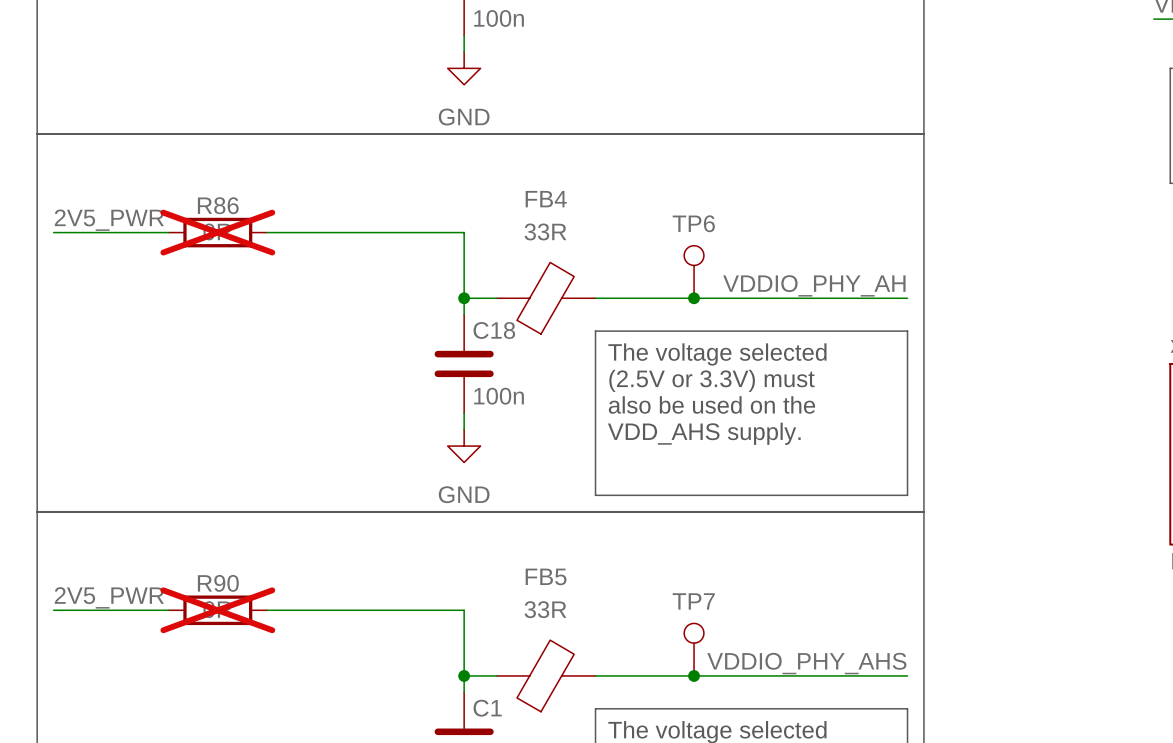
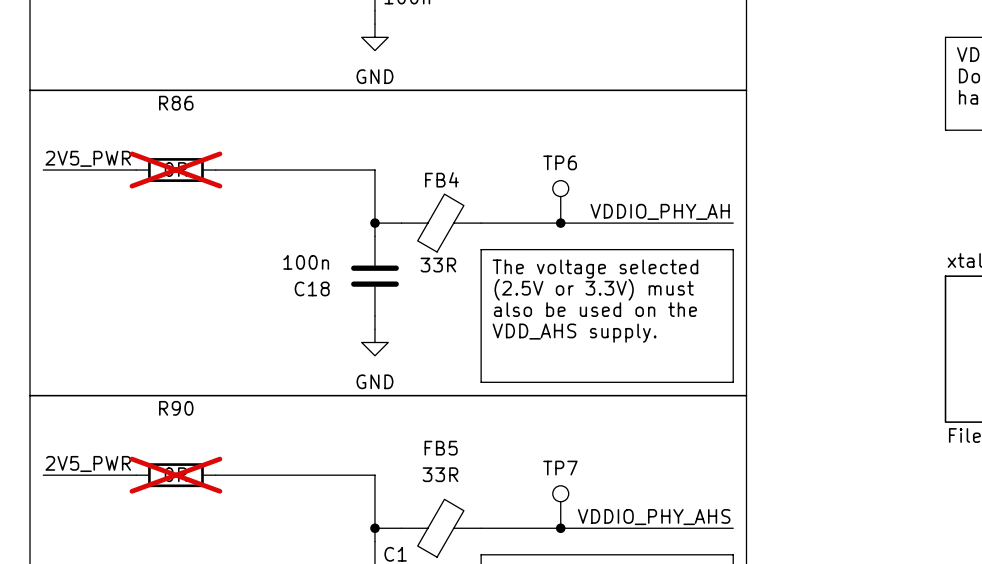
FB4 name position: FB4 (546, 199) -> FB4 (441, 179)
R86 name position: R86 (218, 205) -> R86 (176, 103)
FB4 value position: 33R (545, 231) -> 33R (438, 265)
C18 name position: C18 (494, 330) -> C18 (312, 288)
C18 value position: 100n (499, 396) -> 100n (306, 262)
R90 name position: R90 (218, 583) -> R90 (176, 408)

